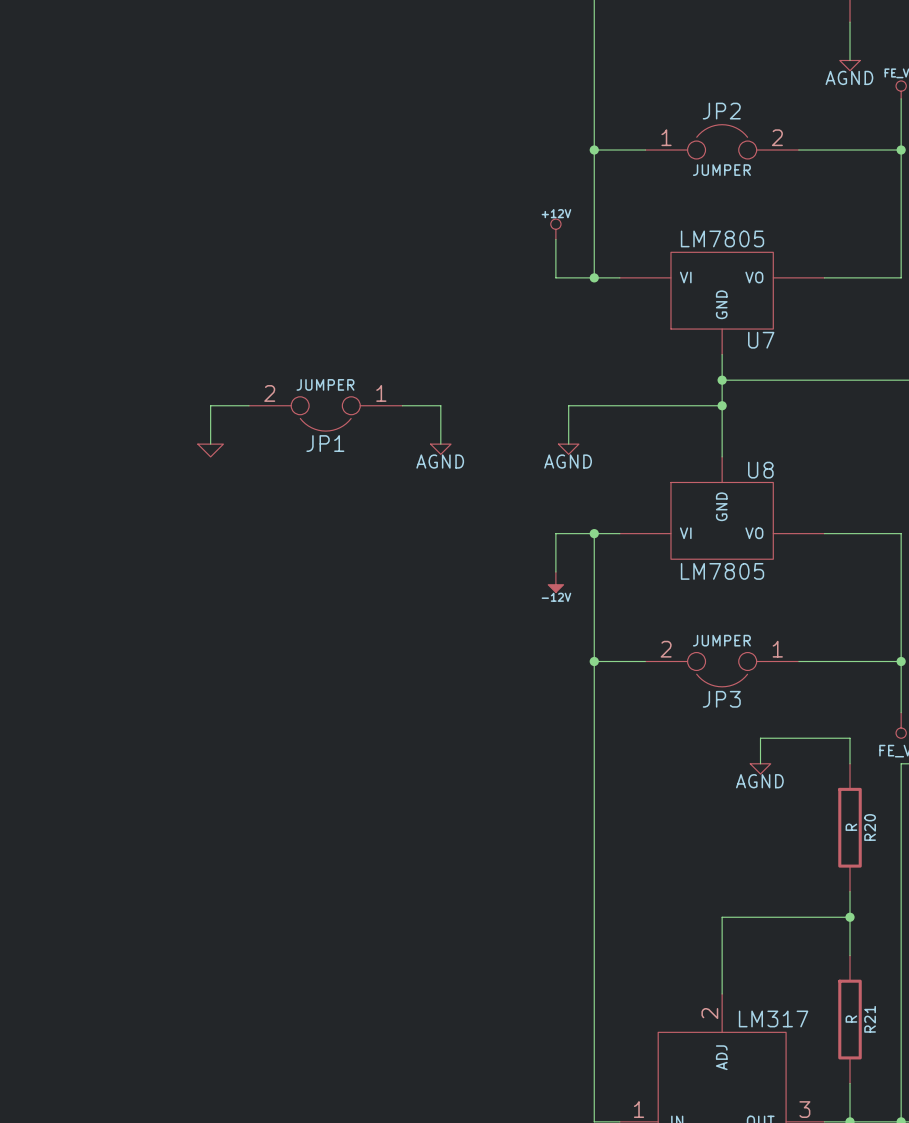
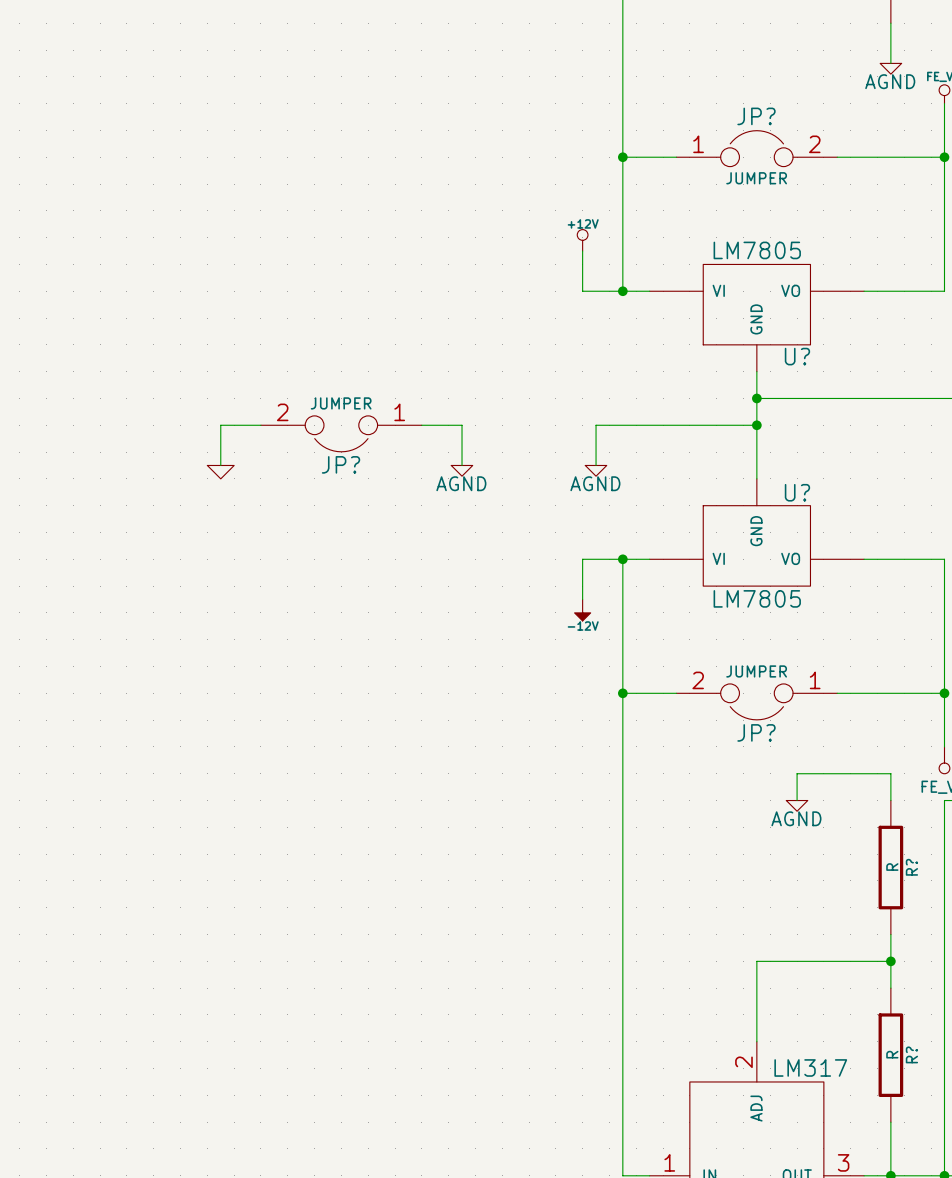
JP2 name: JP2 (721, 111) -> JP? (756, 116)
U7 name: U7 (761, 340) -> U? (797, 356)
JP1 name: JP1 (325, 443) -> JP? (341, 464)
U8 name: U8 (760, 470) -> U? (797, 492)
JP3 name: JP3 (721, 699) -> JP? (756, 732)
R20 name: R20 (870, 827) -> R? (911, 867)
R?: none -> R (890, 1055)
R21: R (850, 1019) -> none

